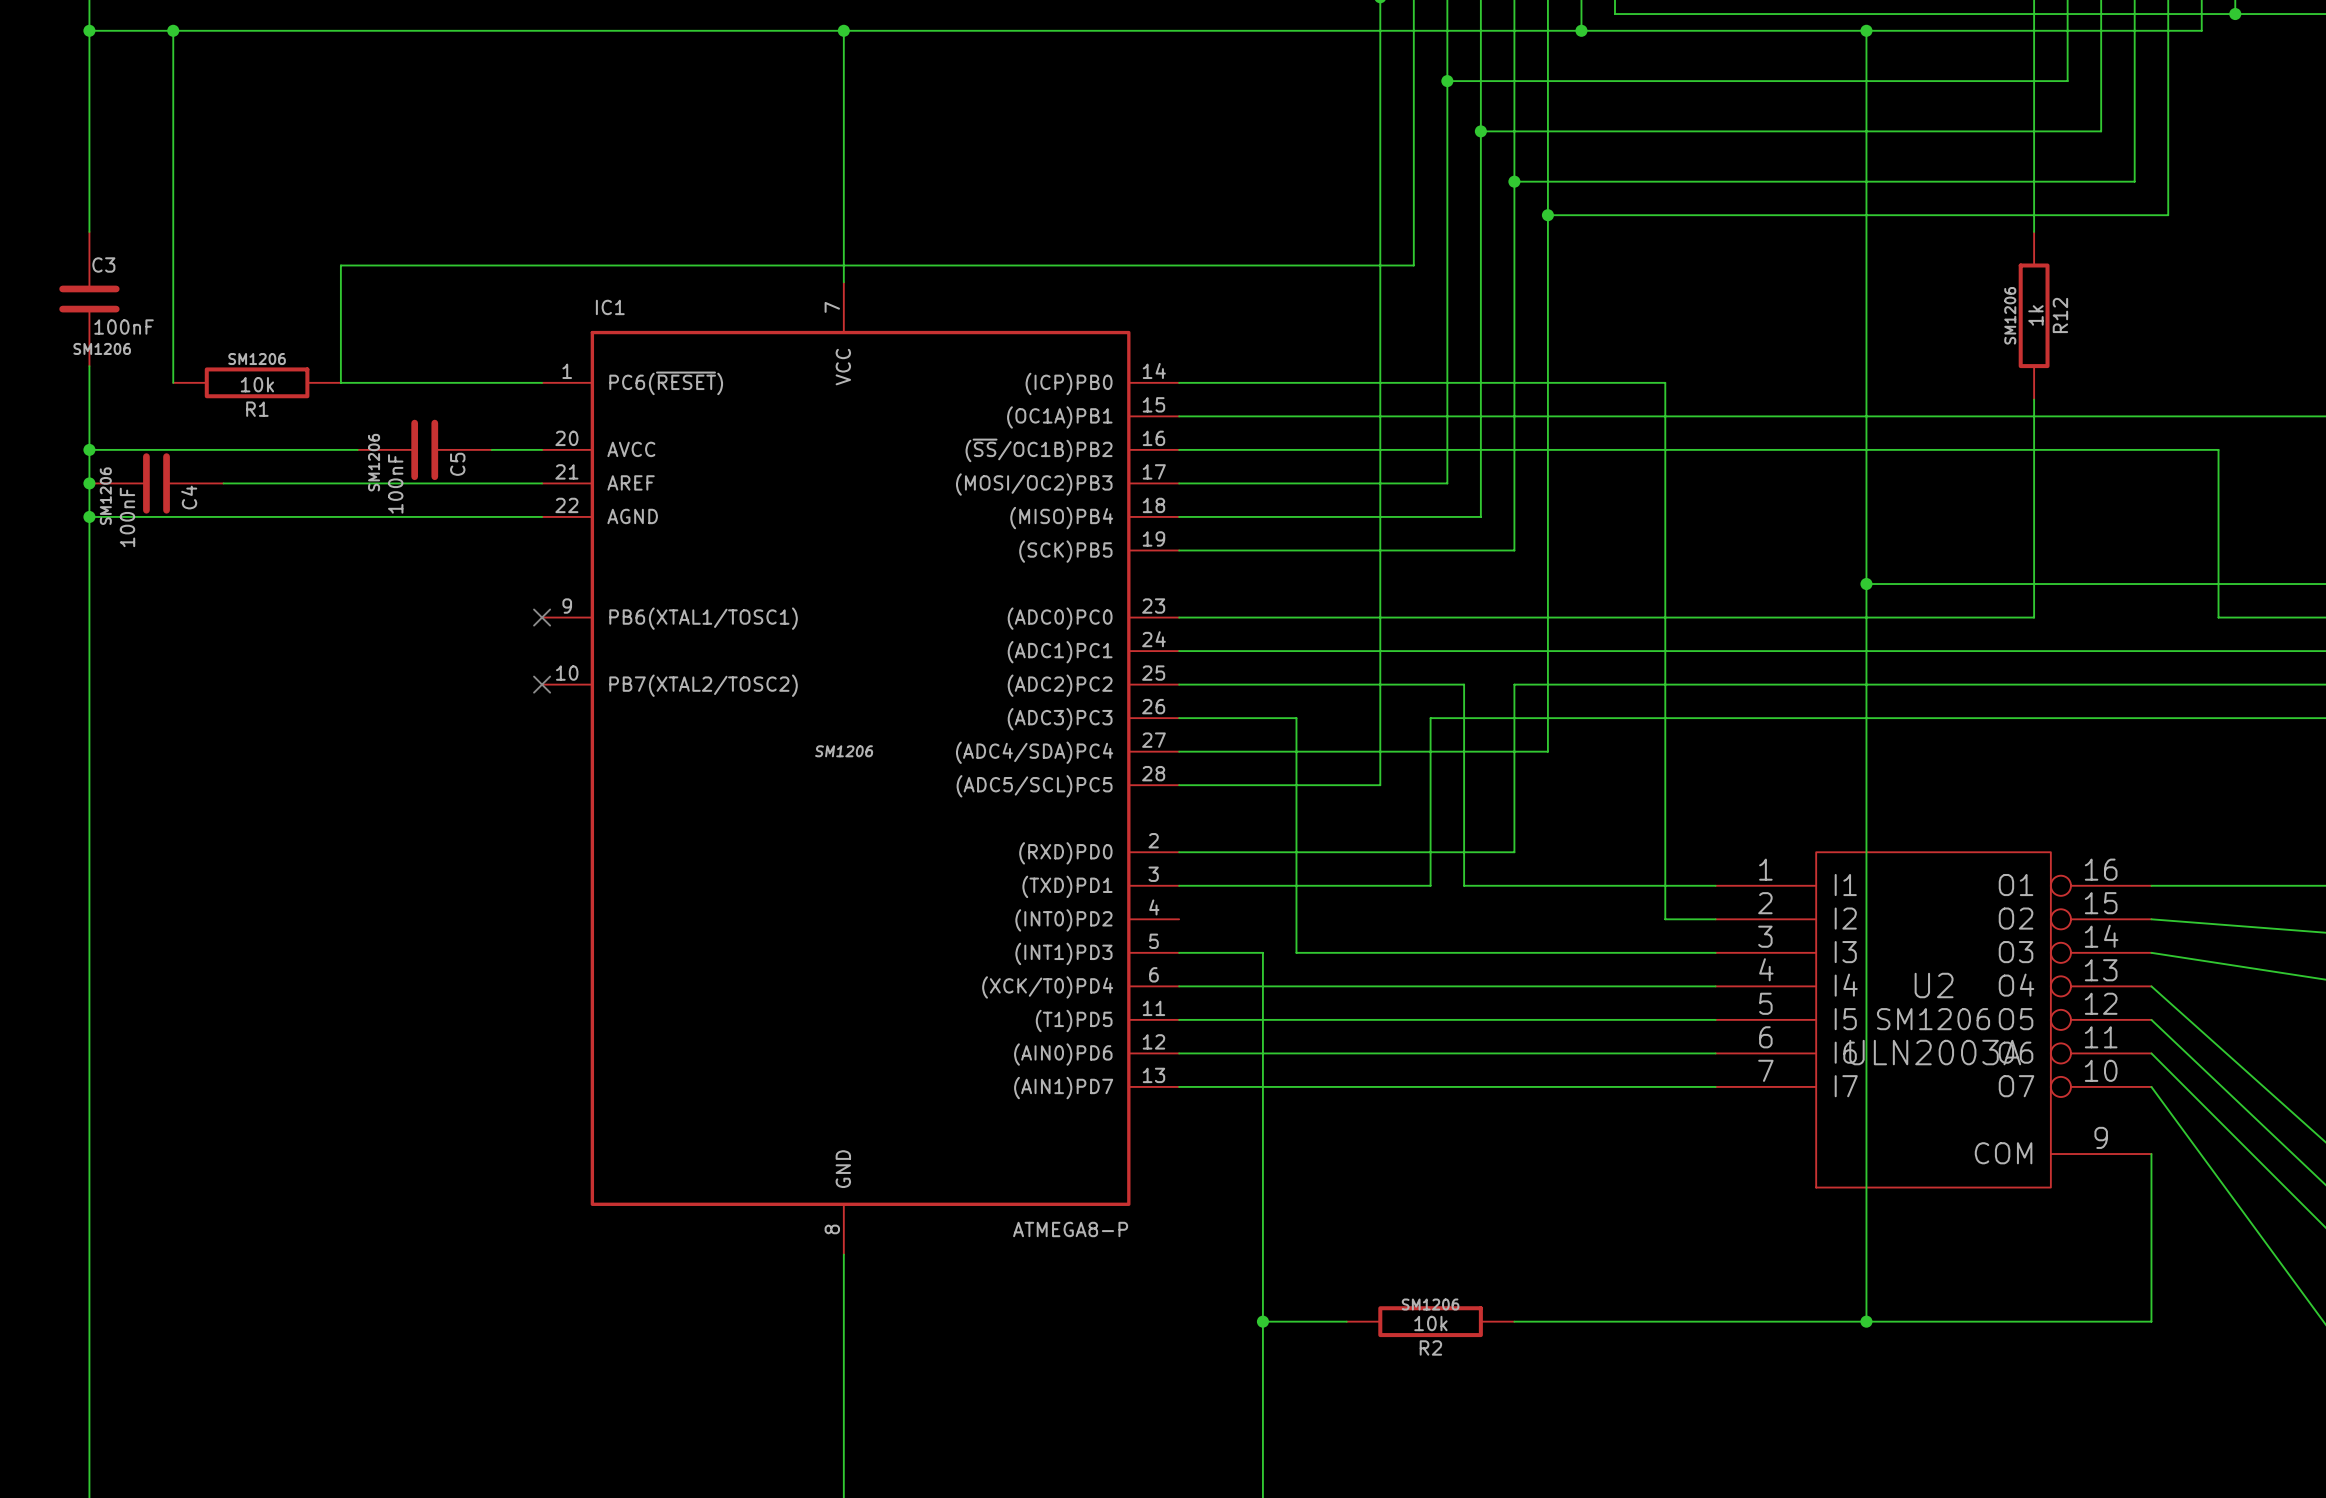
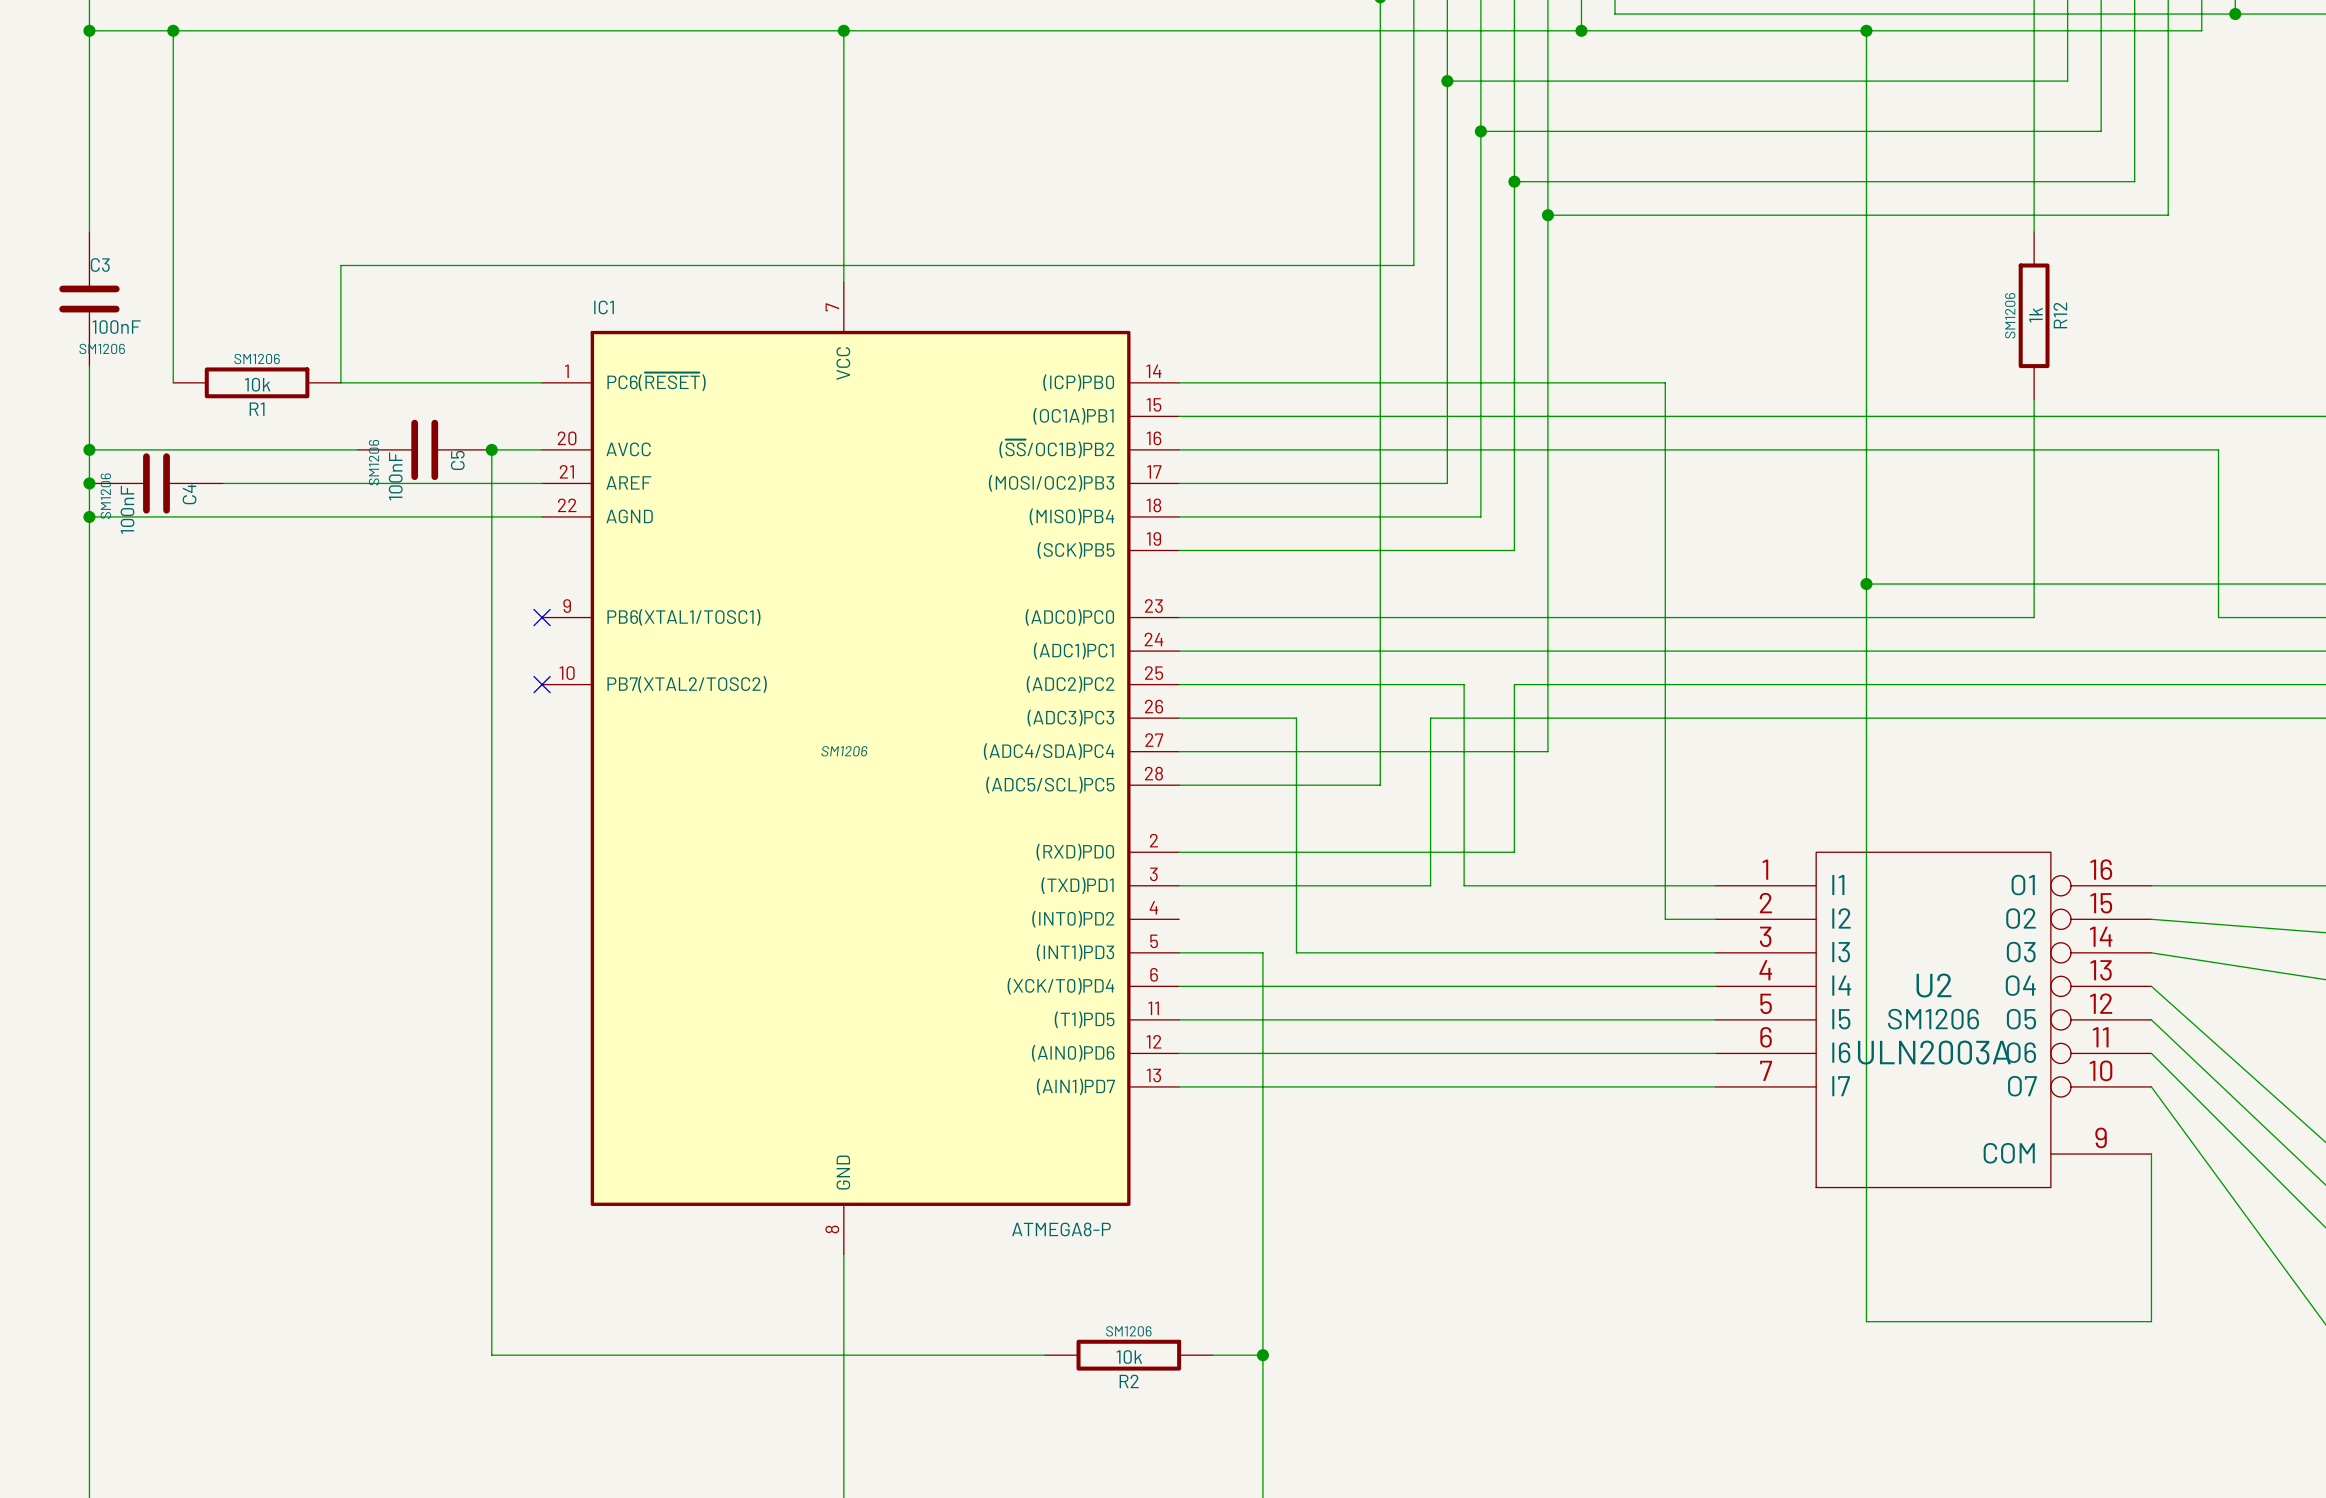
wire: none -> (491, 449) (491, 1355) (1045, 1355)
junction: none -> (491, 449)
R2 text position: SM1206 (1430, 1304) -> SM1206 (1128, 1331)
wire: (1262, 1321) (1346, 1321) -> none
junction position: (1262, 1321) -> (1262, 1355)
R2 position: (1430, 1321) -> (1128, 1355)
wire: (1514, 1321) (1866, 1321) -> none
junction: (1866, 1321) -> none
wire: none -> (1212, 1355) (1262, 1355)

